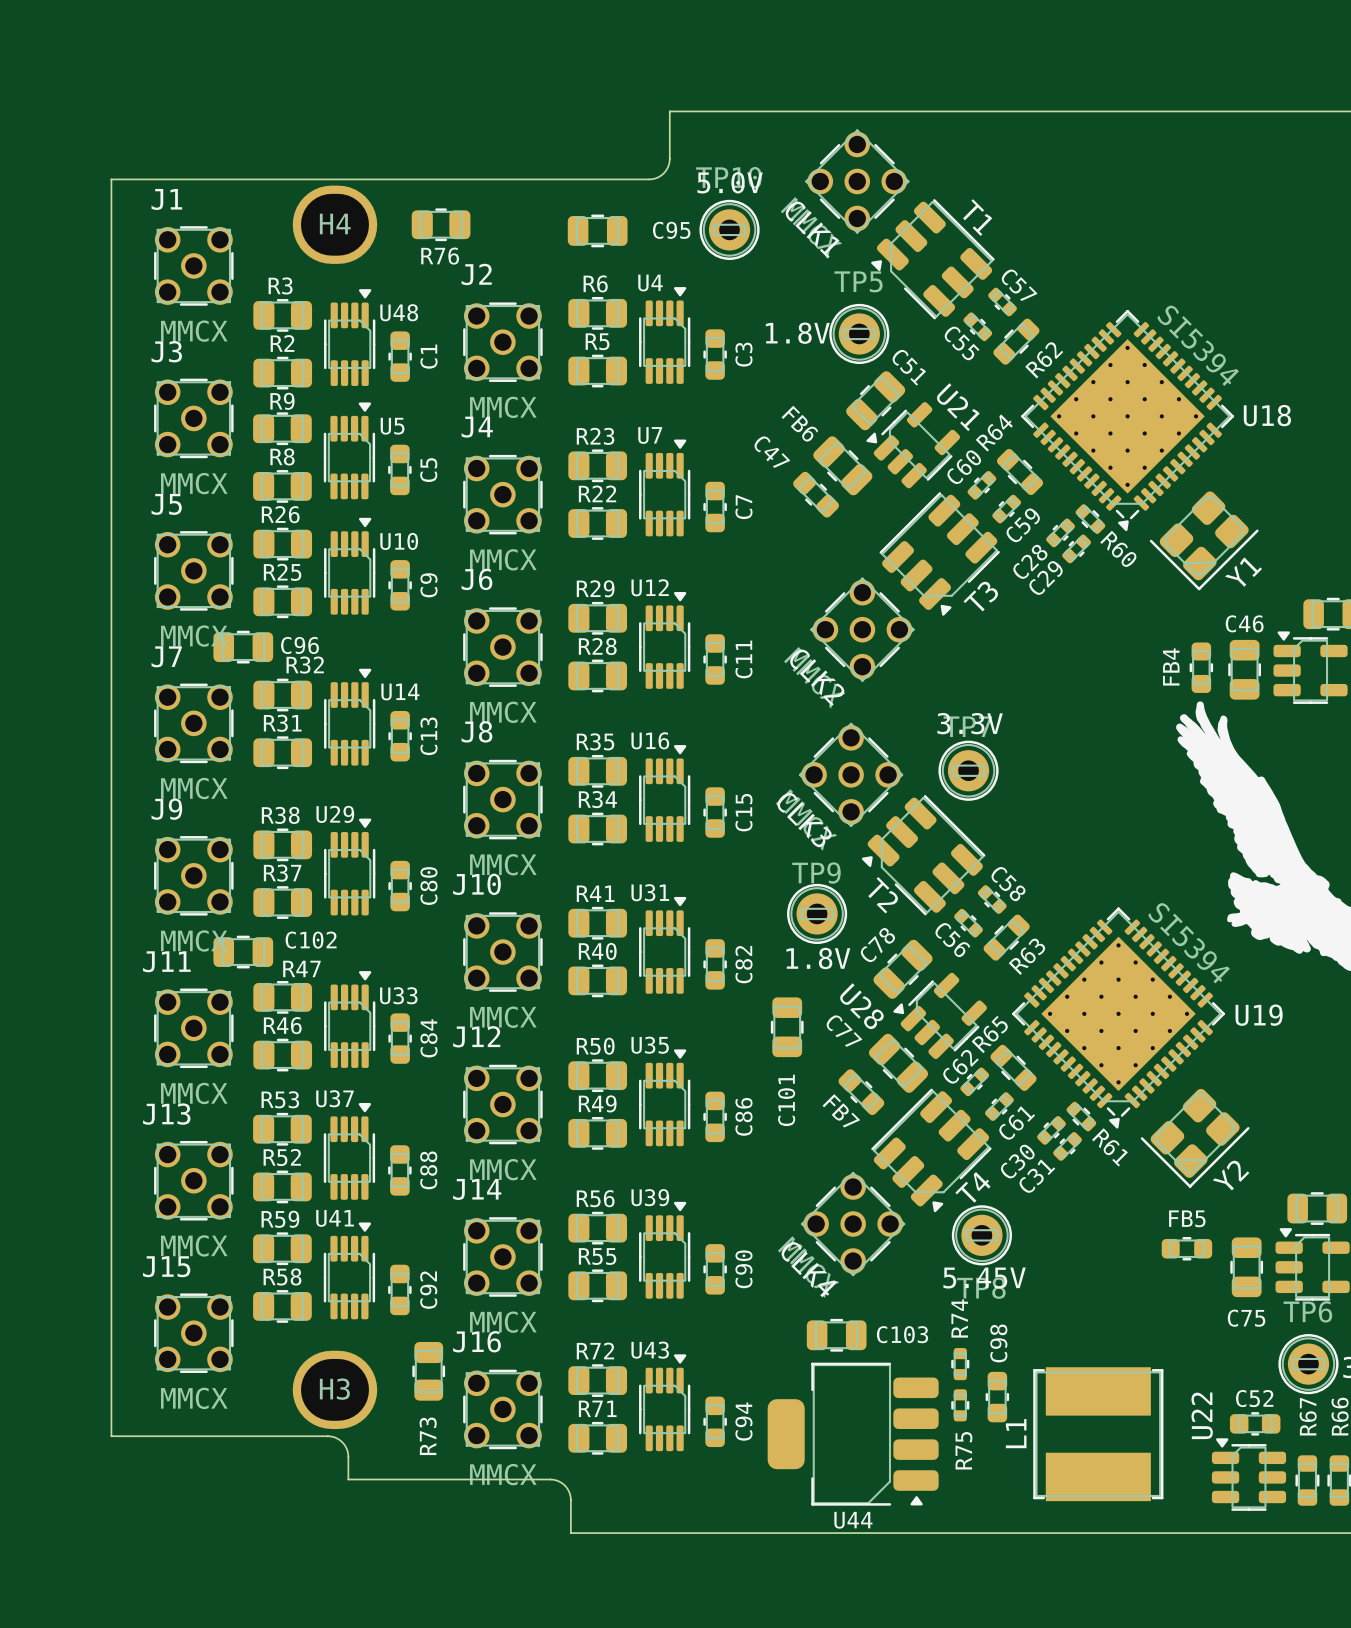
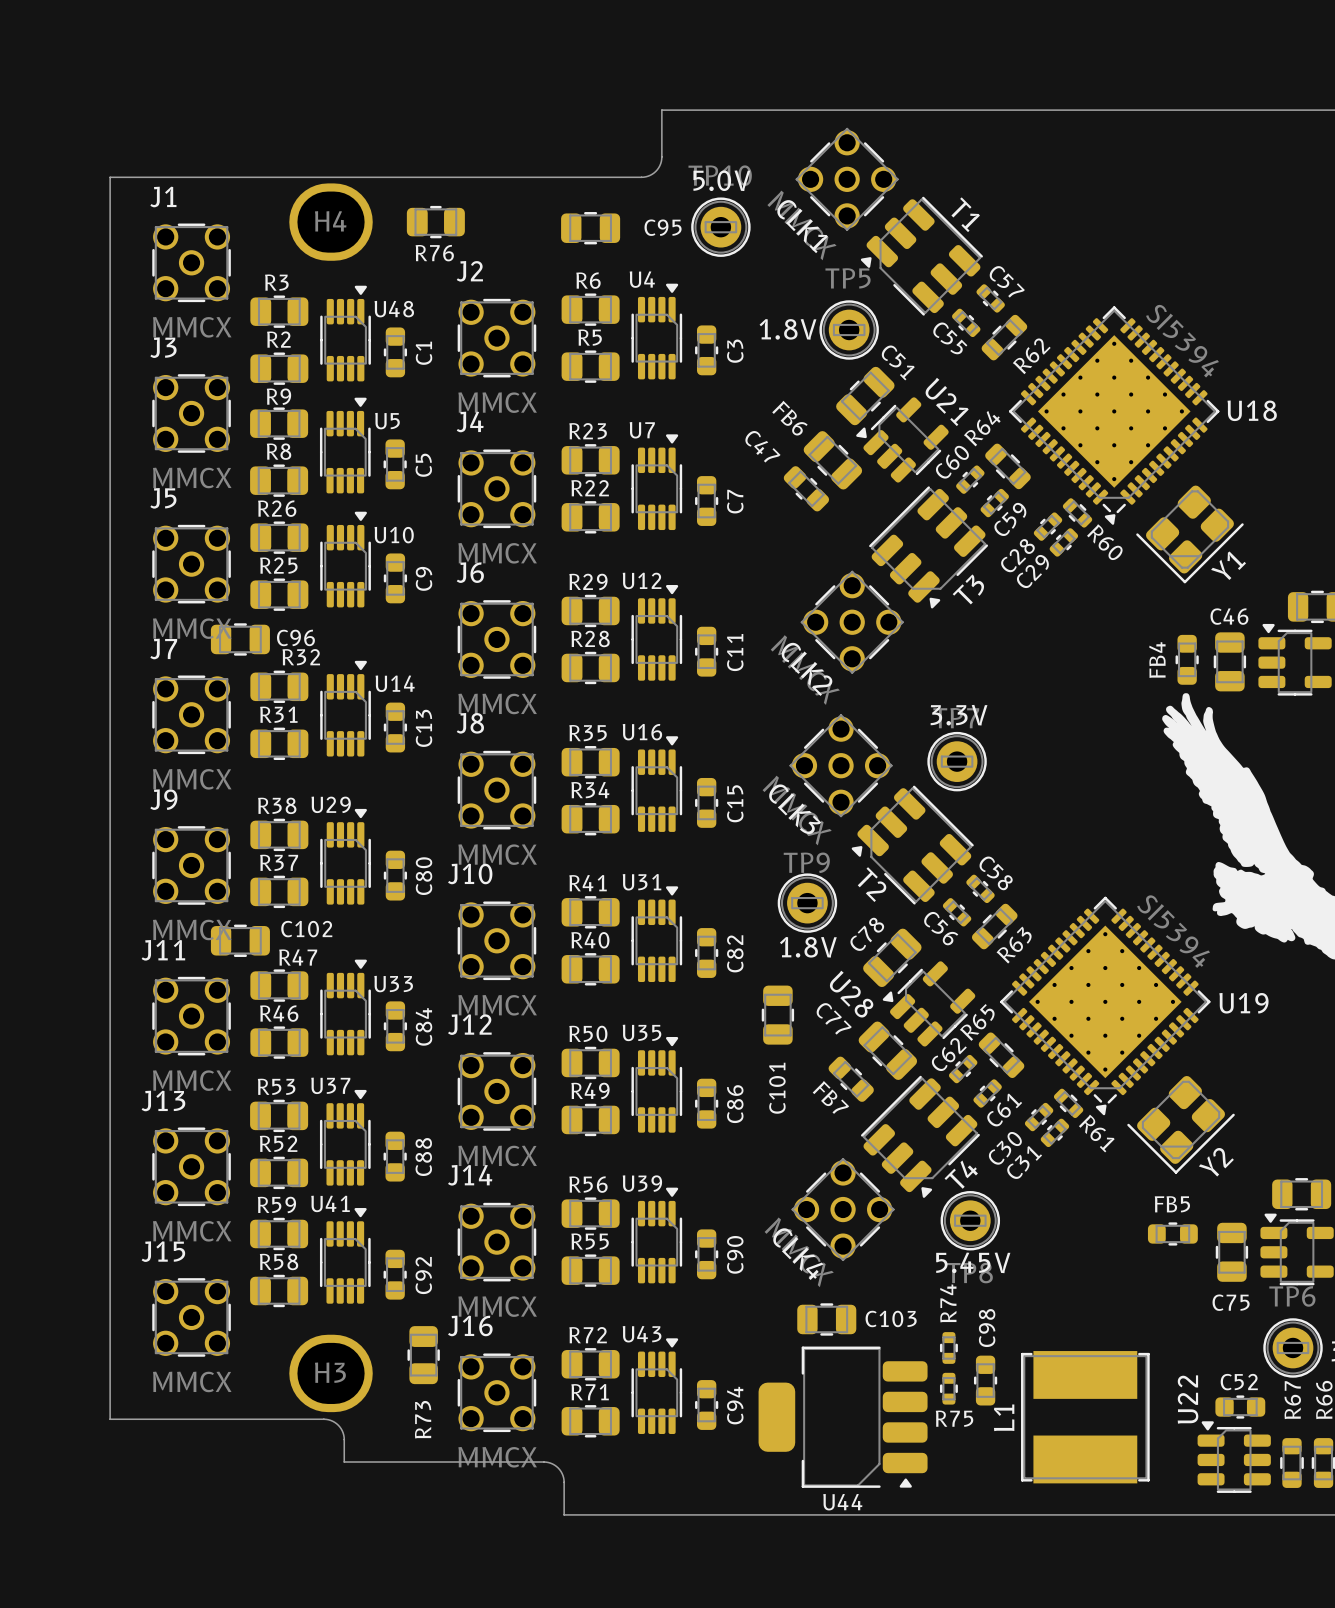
R75 name rotation: 0° (963, 1450) -> 90° clockwise (954, 1418)

